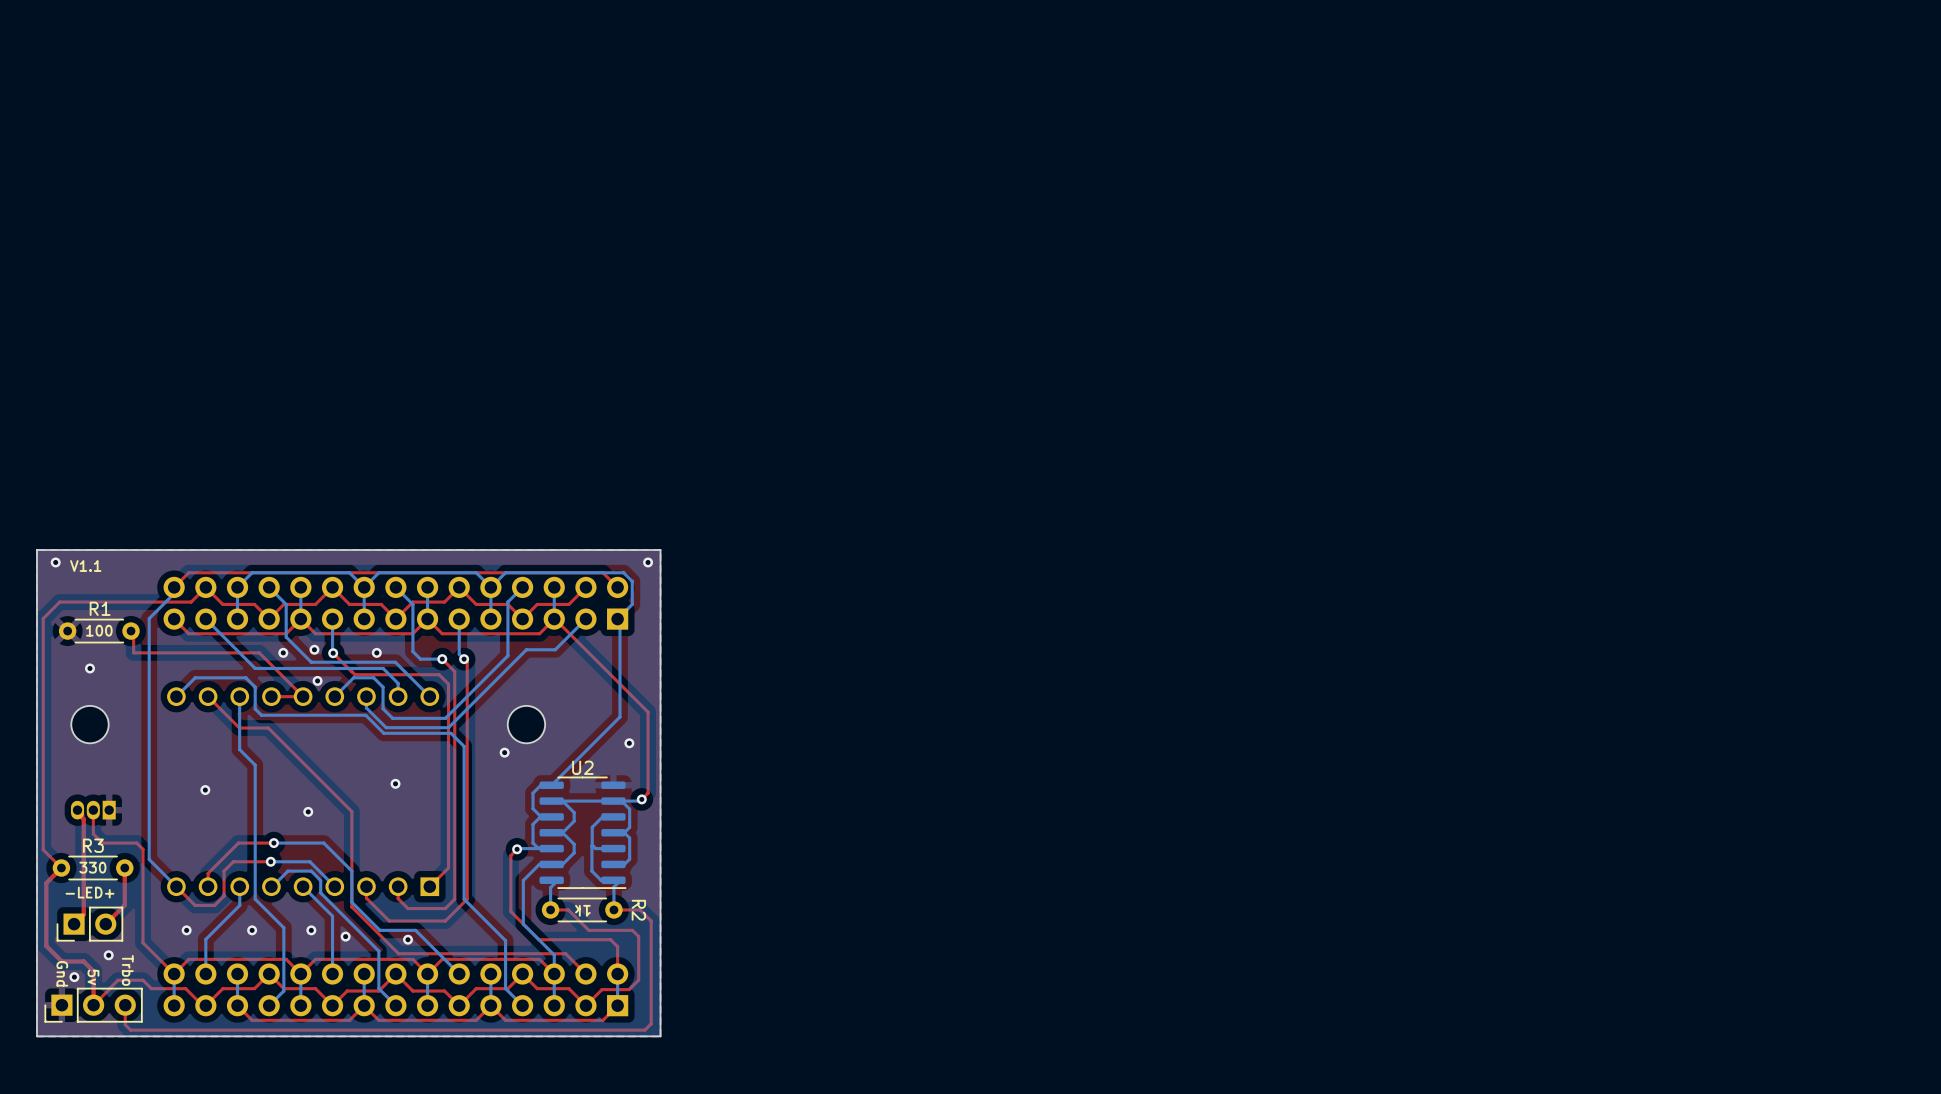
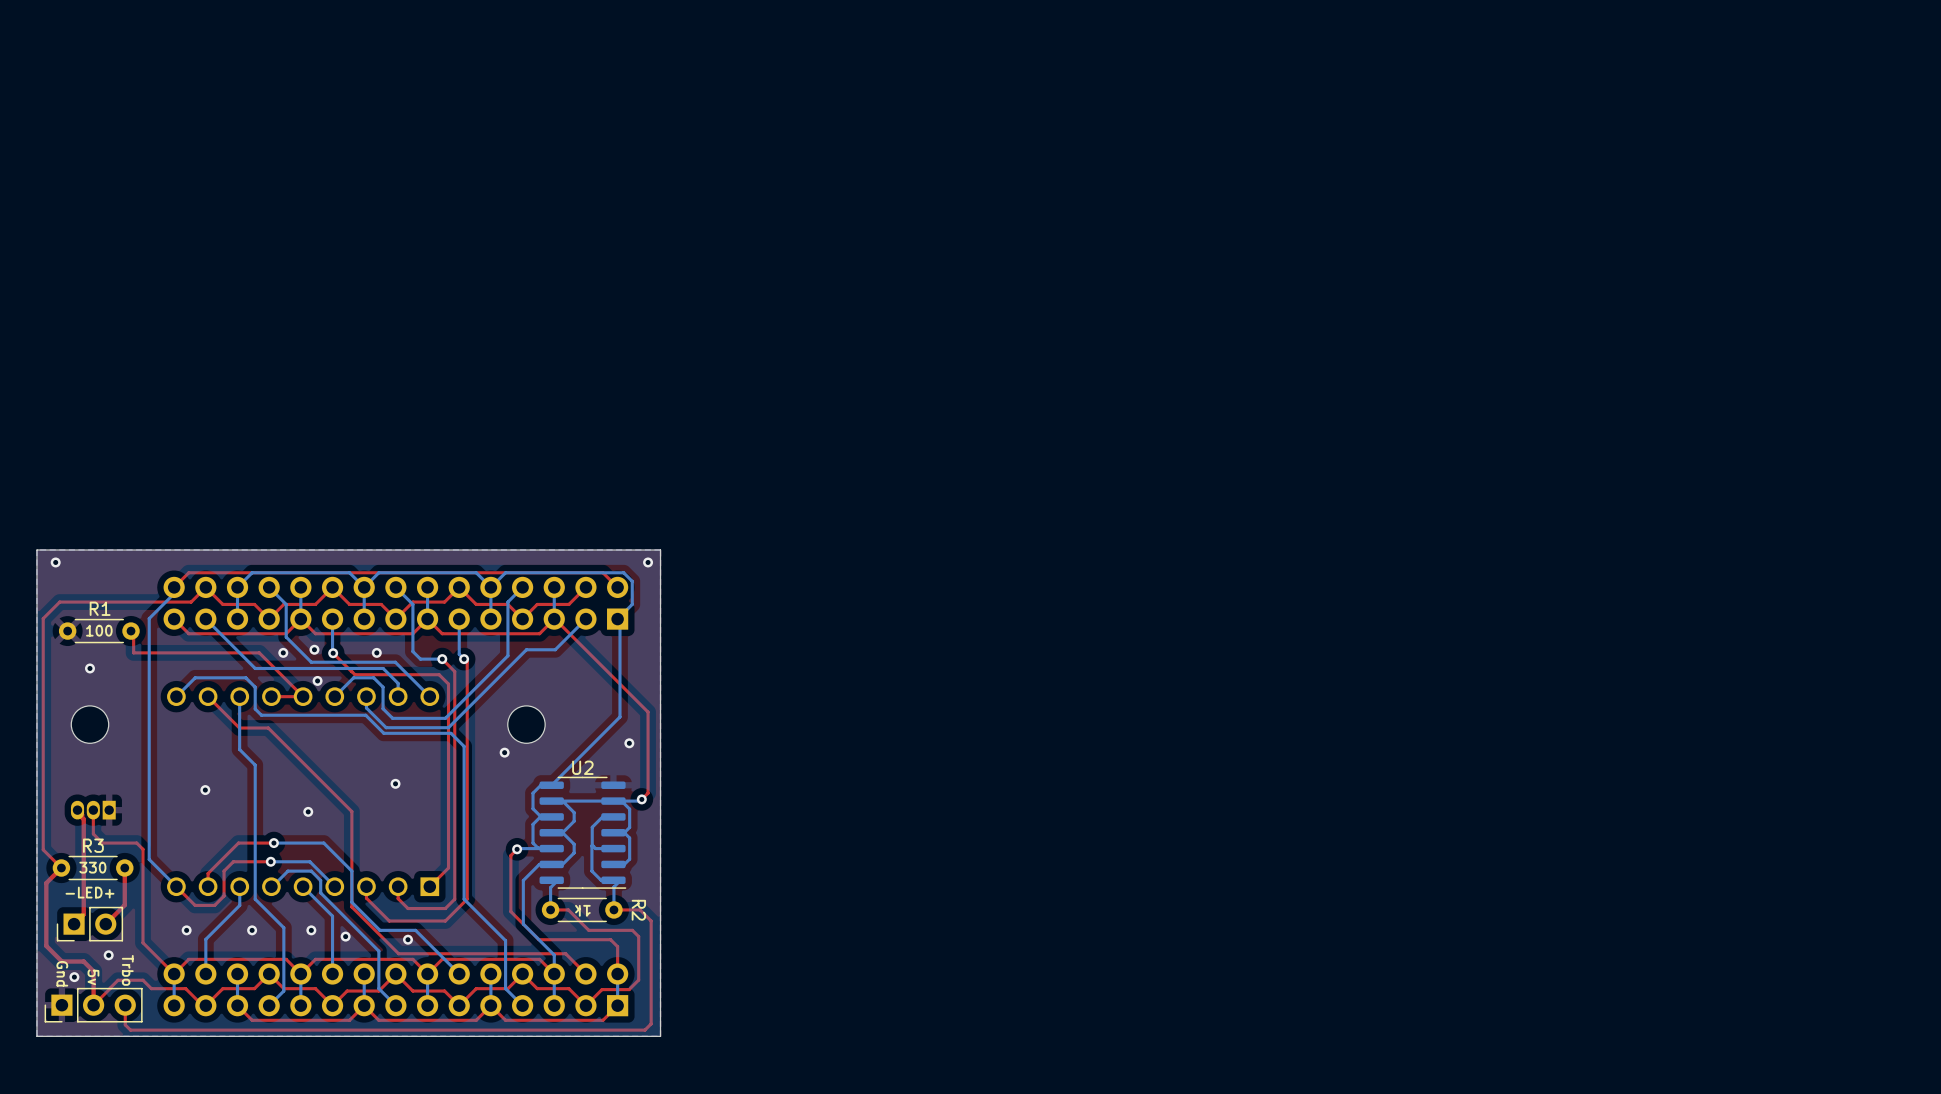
text: V1.1 (85, 566) -> none

